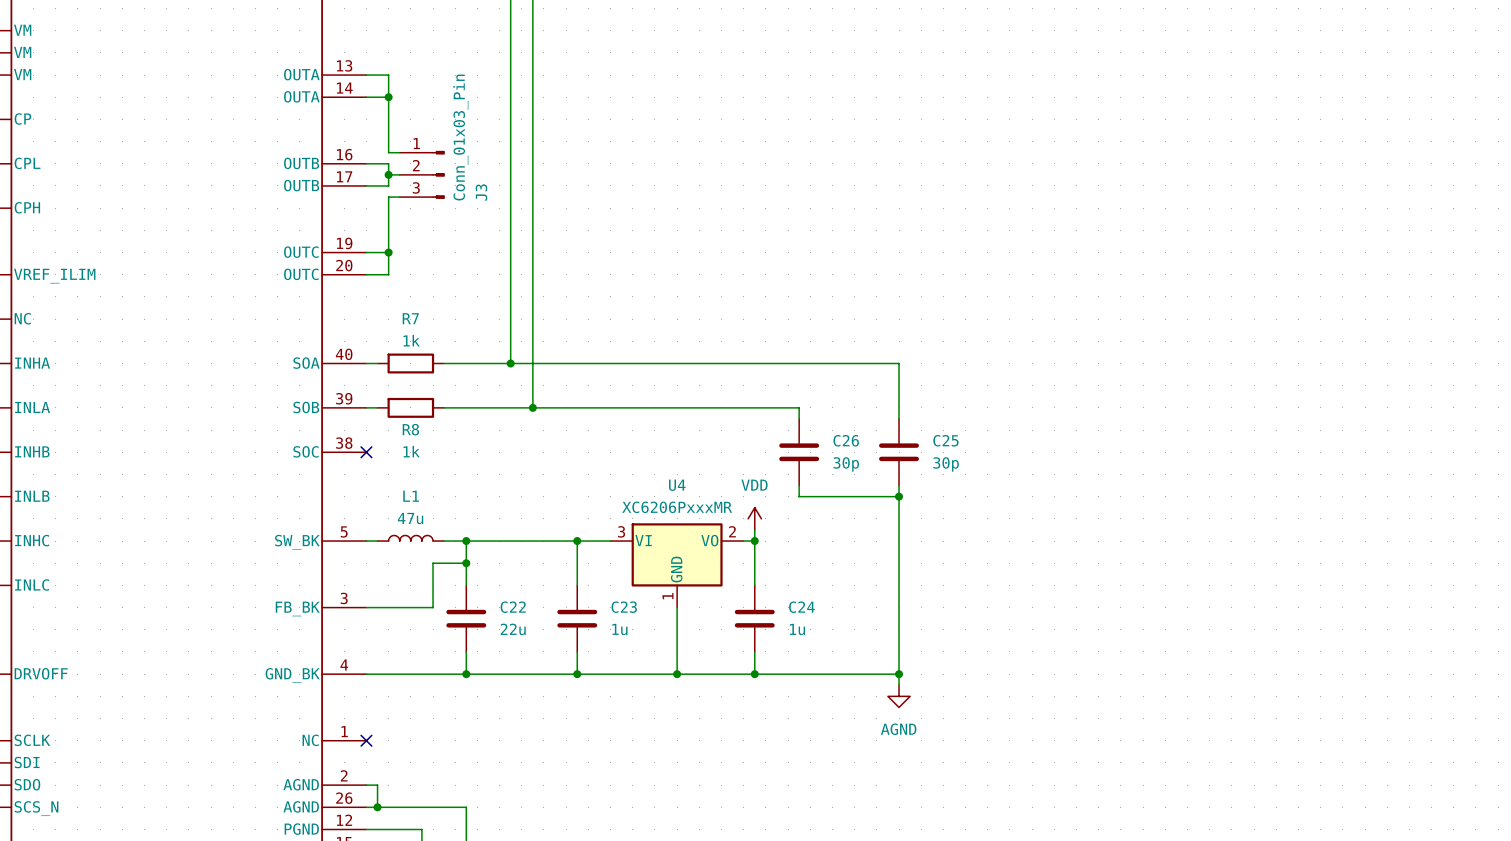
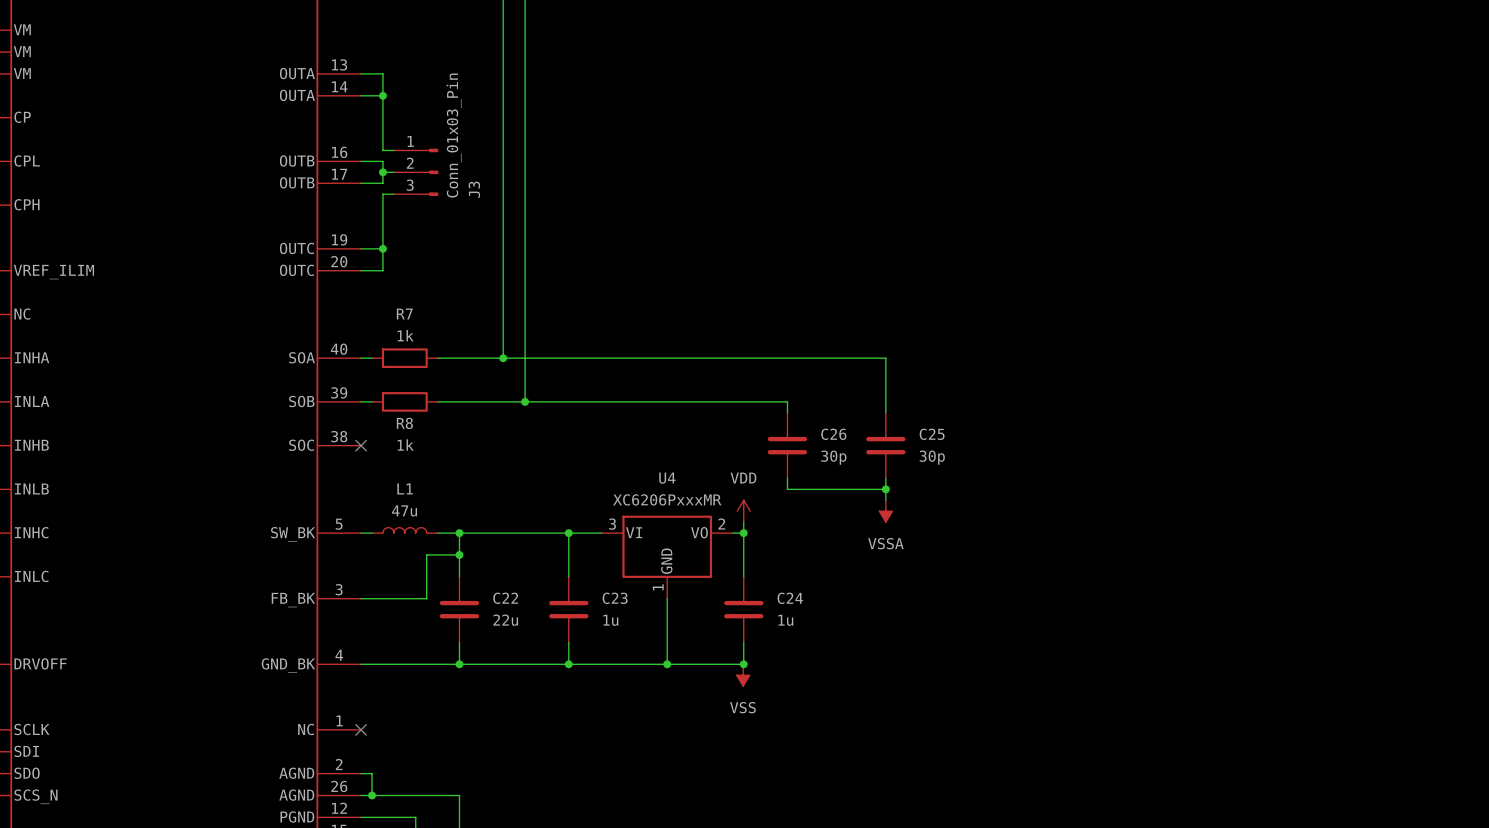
wire: (899, 507) (899, 685) -> none
power symbol: none -> VSSA (885, 511)
wire: (754, 674) (899, 674) -> none
junction: (899, 674) -> none
power symbol: none -> VSS (743, 675)
power symbol: AGND (899, 696) -> none

